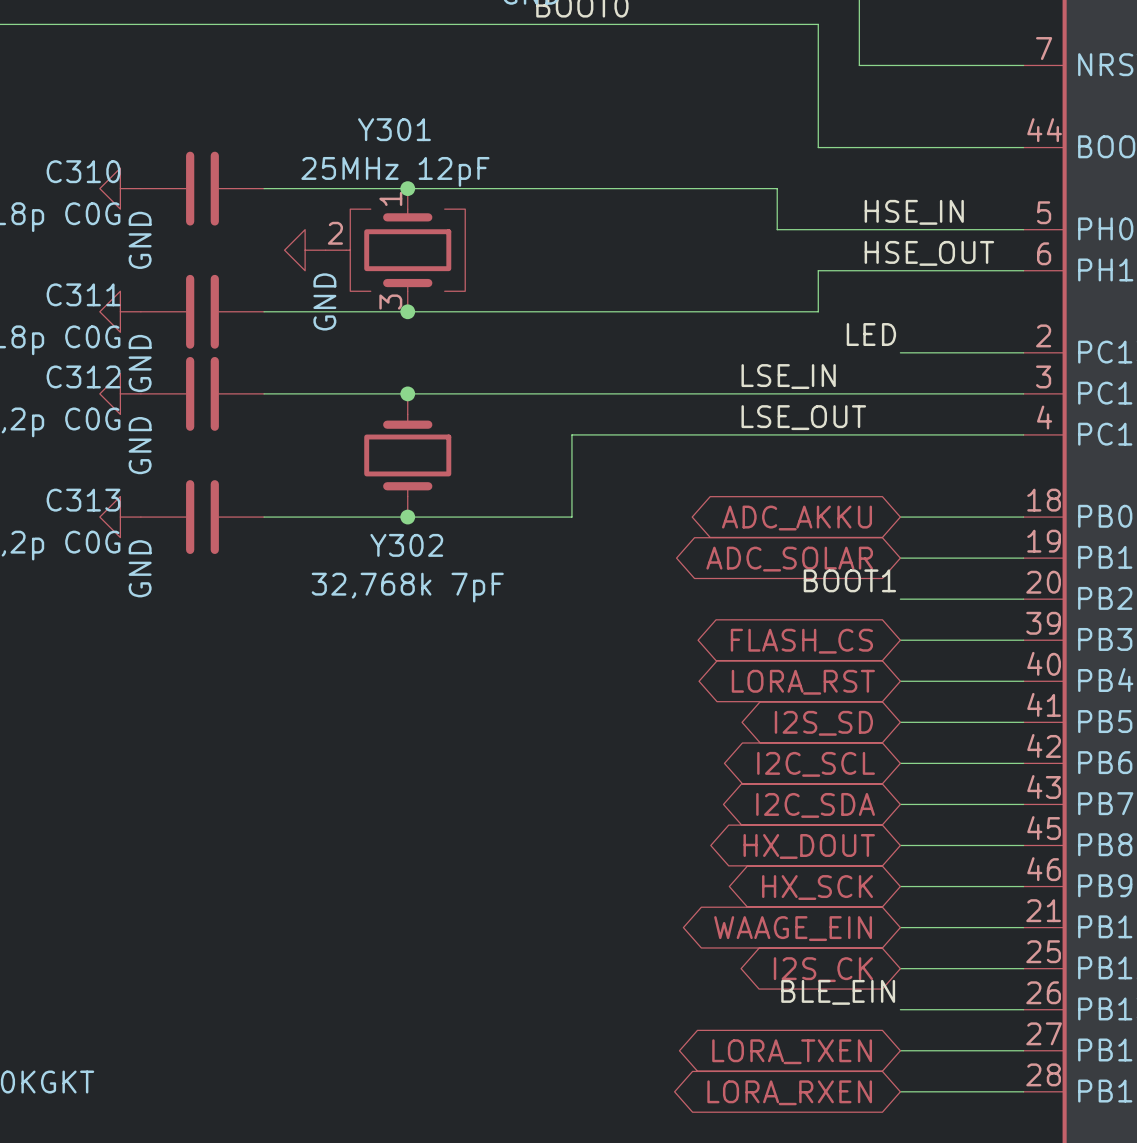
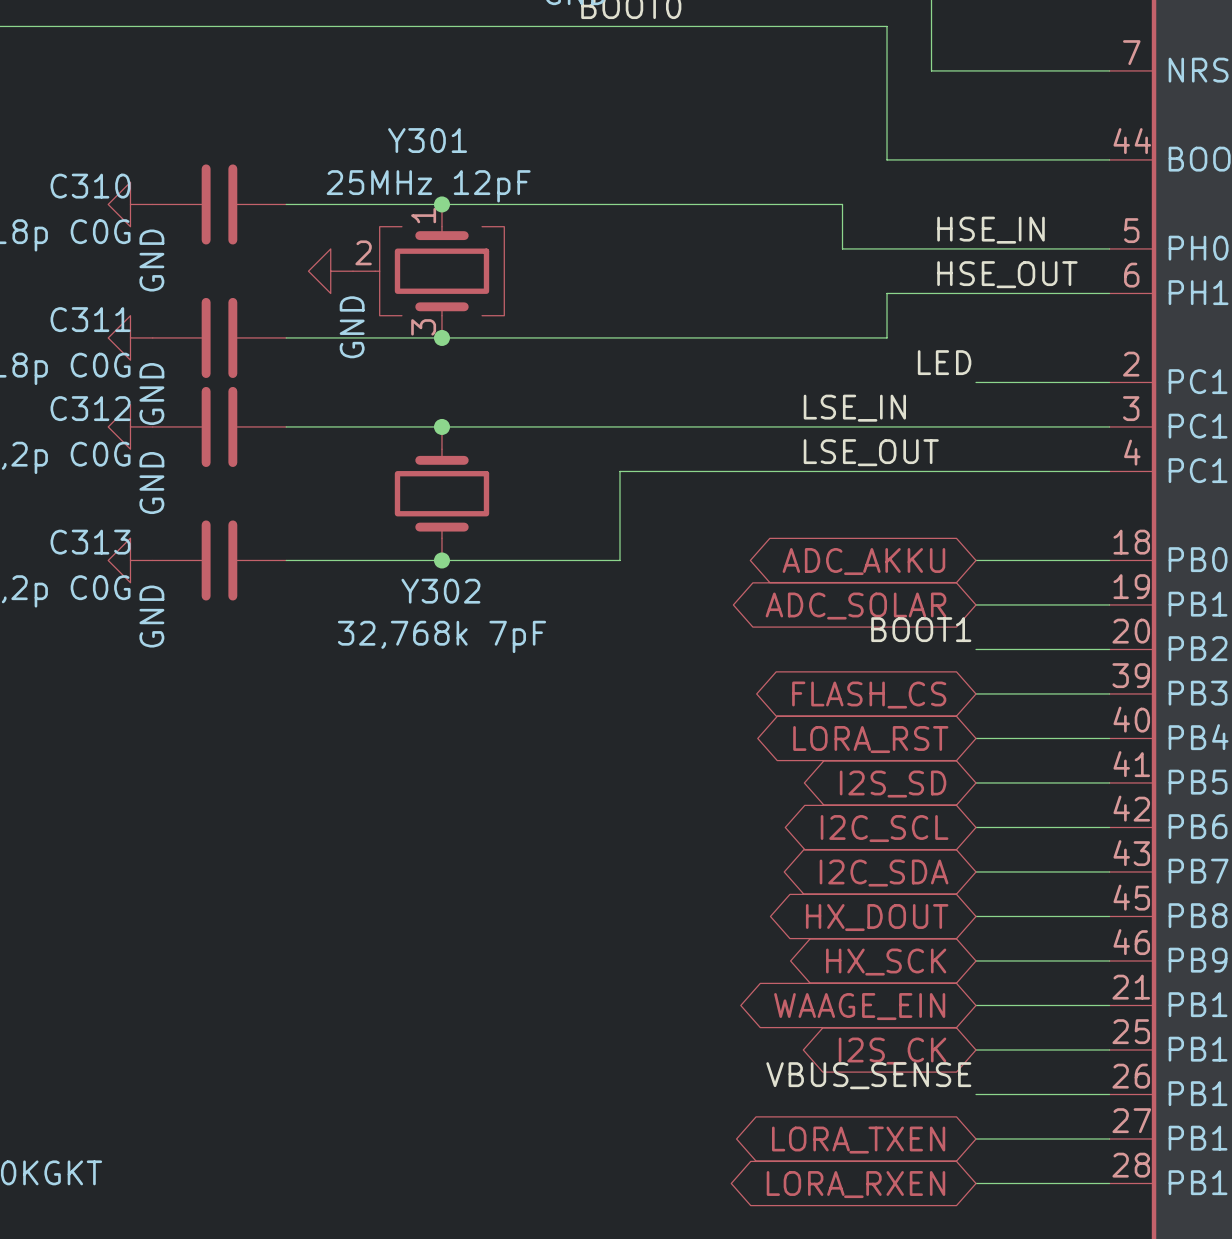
label: BLE_EIN (838, 992) -> VBUS_SENSE (868, 1075)

